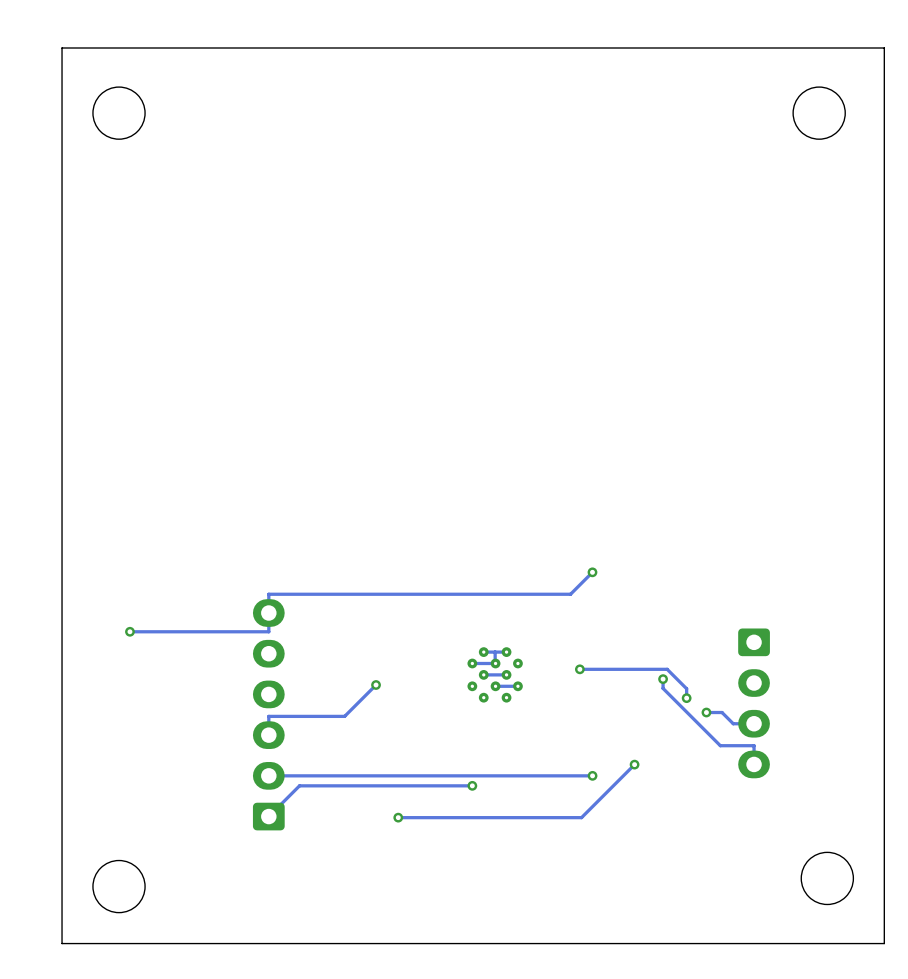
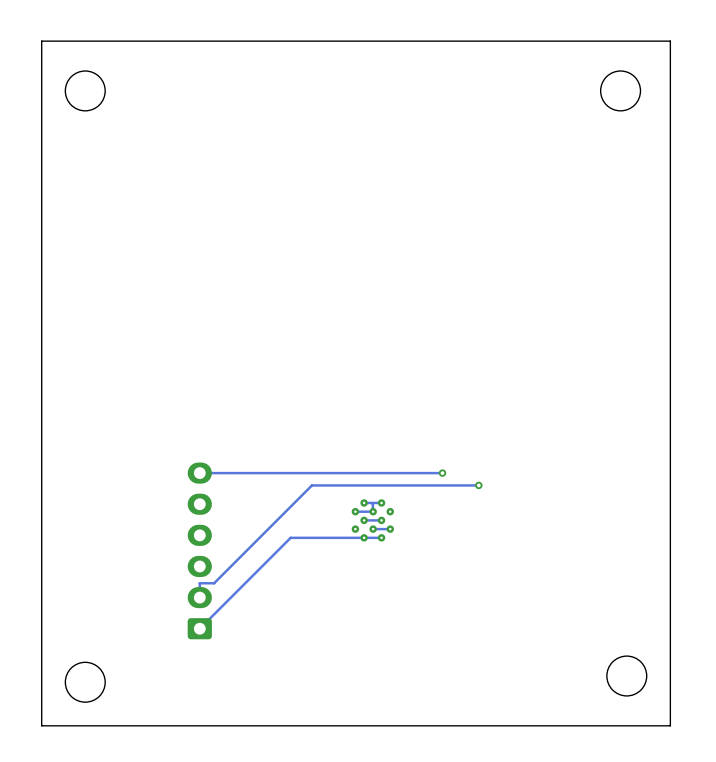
track: (592, 572) (570, 594) (268, 594) (268, 631) (129, 631) -> none
via: (592, 572) -> none
track: none -> (442, 473) (199, 473)
via: none -> (442, 473)
via: none -> (478, 485)
via: (129, 631) -> none
track: (579, 669) (667, 669) (686, 688) (686, 698) -> none
via: (579, 669) -> none
track: (663, 679) (663, 688) (720, 745) (754, 745) (754, 764) -> none
via: (663, 679) -> none
track: (376, 685) (344, 716) (268, 716) (268, 735) -> none
via: (376, 685) -> none
via: (686, 698) -> none
part: (754, 703) -> none
track: (706, 712) (722, 712) (733, 723) (754, 723) -> none
via: (706, 712) -> none
track: (634, 764) (581, 817) (398, 817) -> none
via: (634, 764) -> none
track: (592, 775) (268, 775) -> (478, 485) (311, 485) (214, 583) (199, 583) (199, 597)
via: (592, 775) -> none
track: (472, 785) (299, 785) -> (381, 537) (290, 537) (223, 605)
via: (472, 785) -> none
via: (398, 817) -> none

